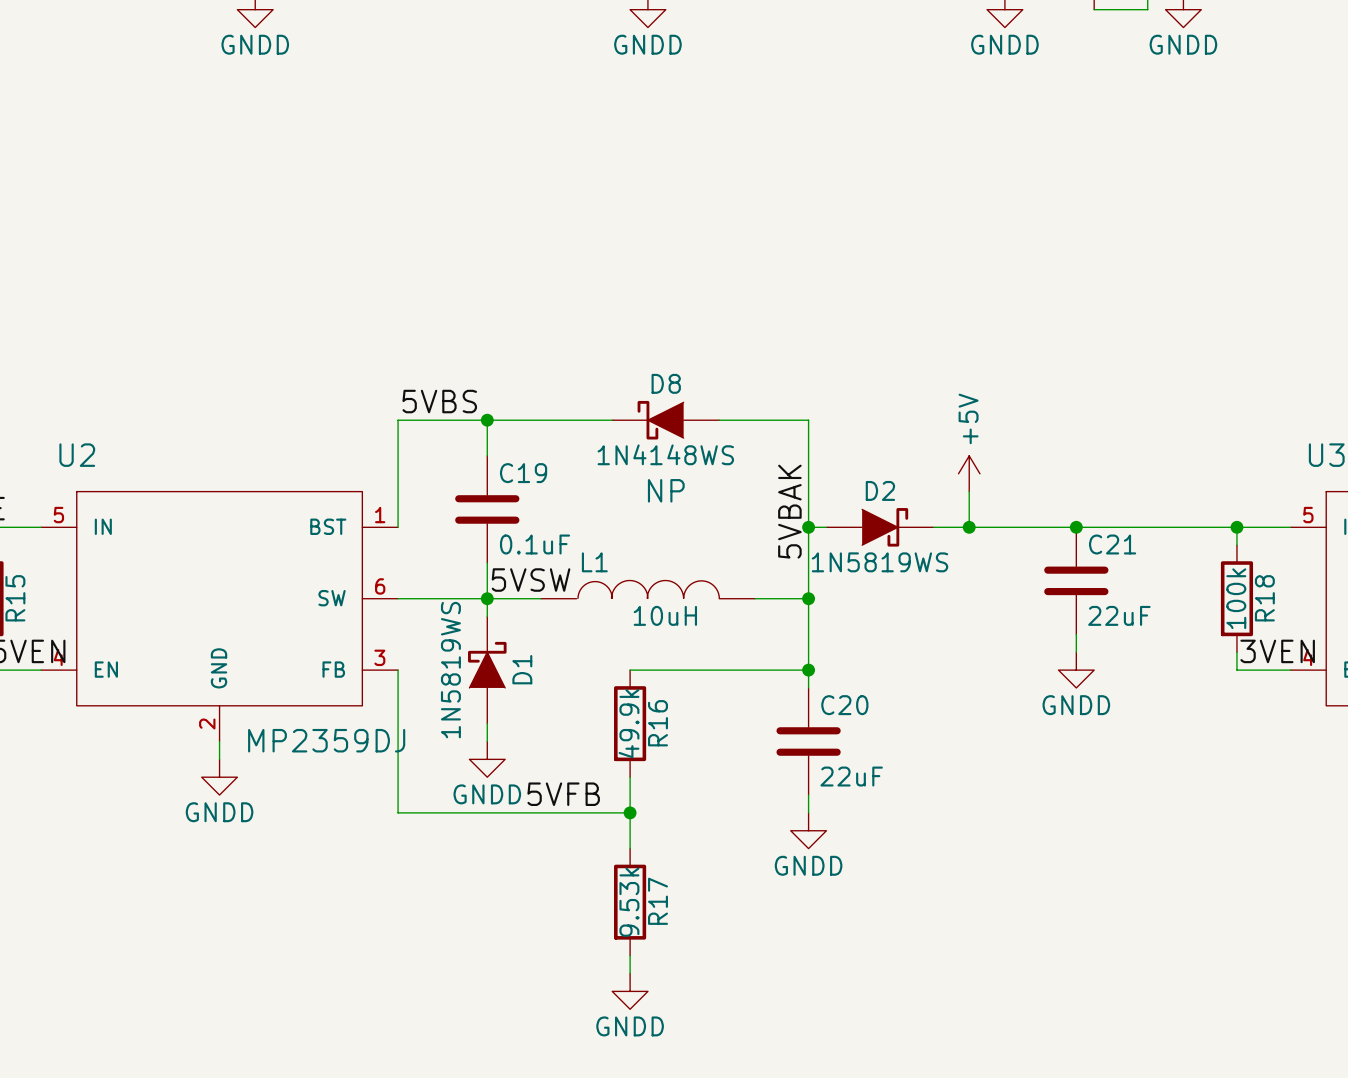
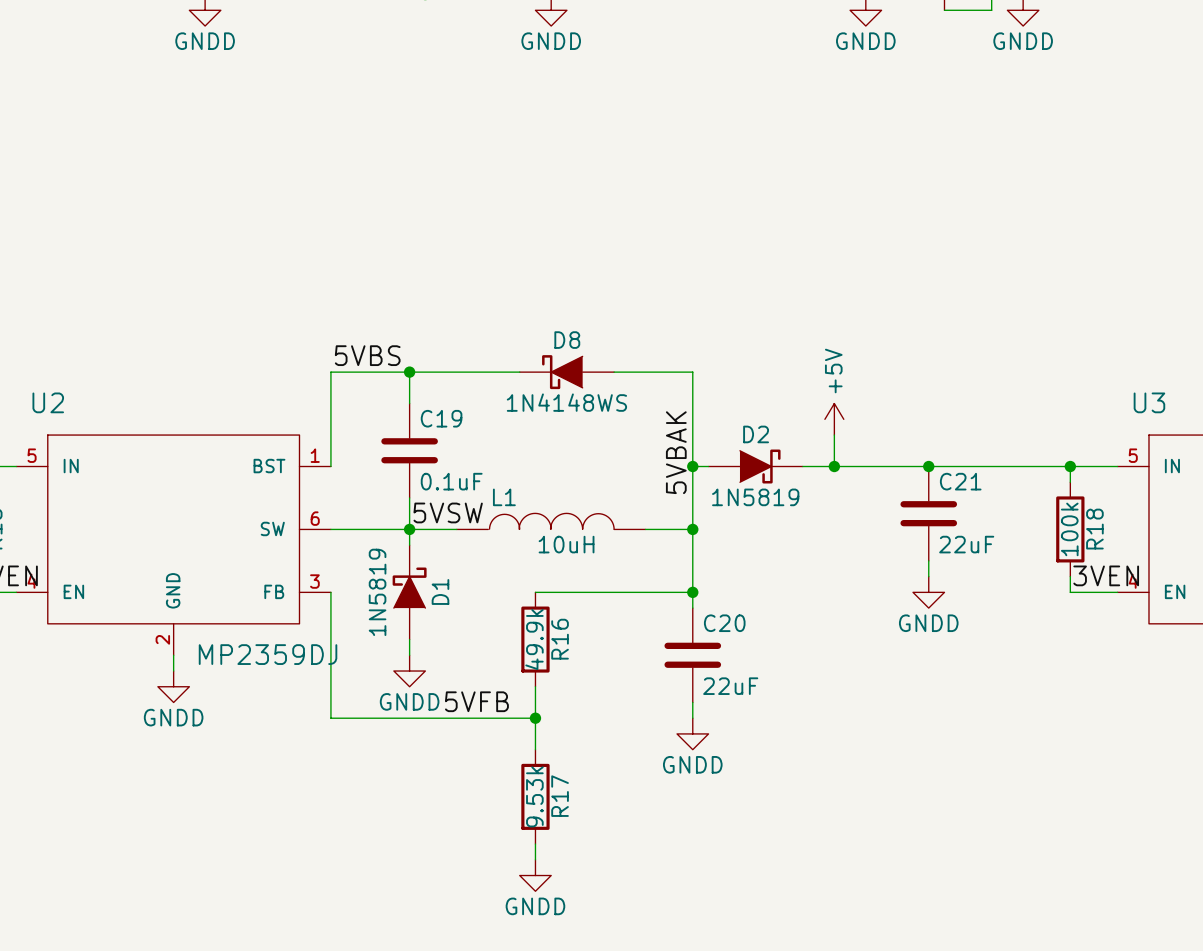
D8 text: NP (666, 490) -> none
D2 value: 1N5819WS (879, 562) -> 1N5819 (755, 497)
D1 value: 1N5819WS (450, 670) -> 1N5819 (377, 592)

